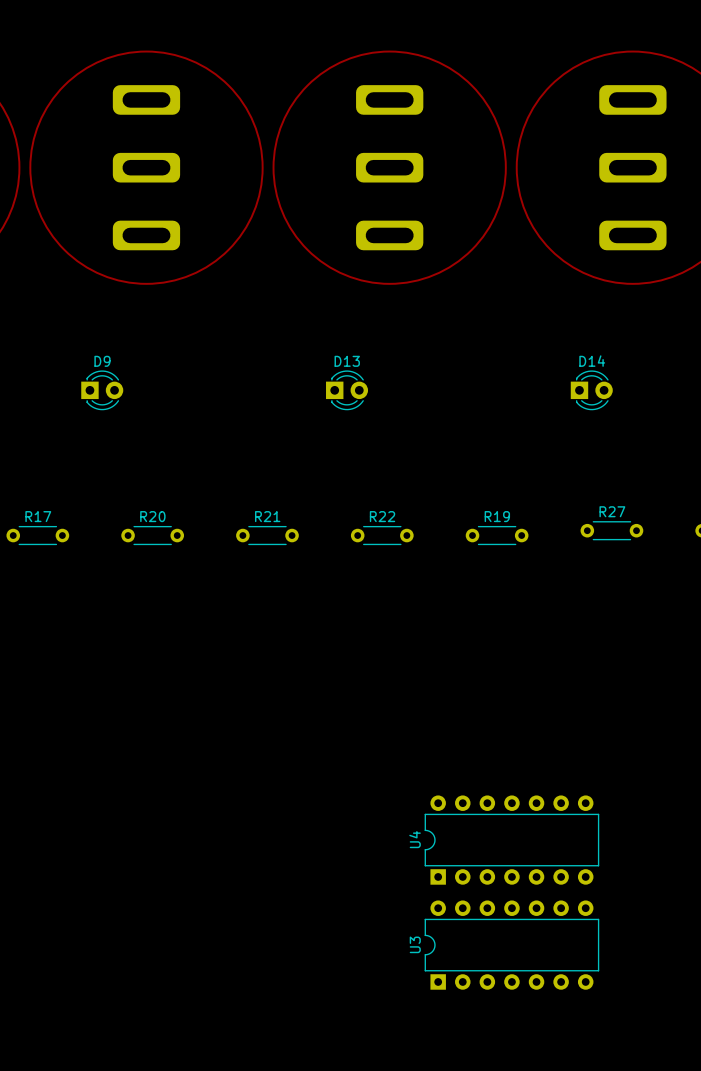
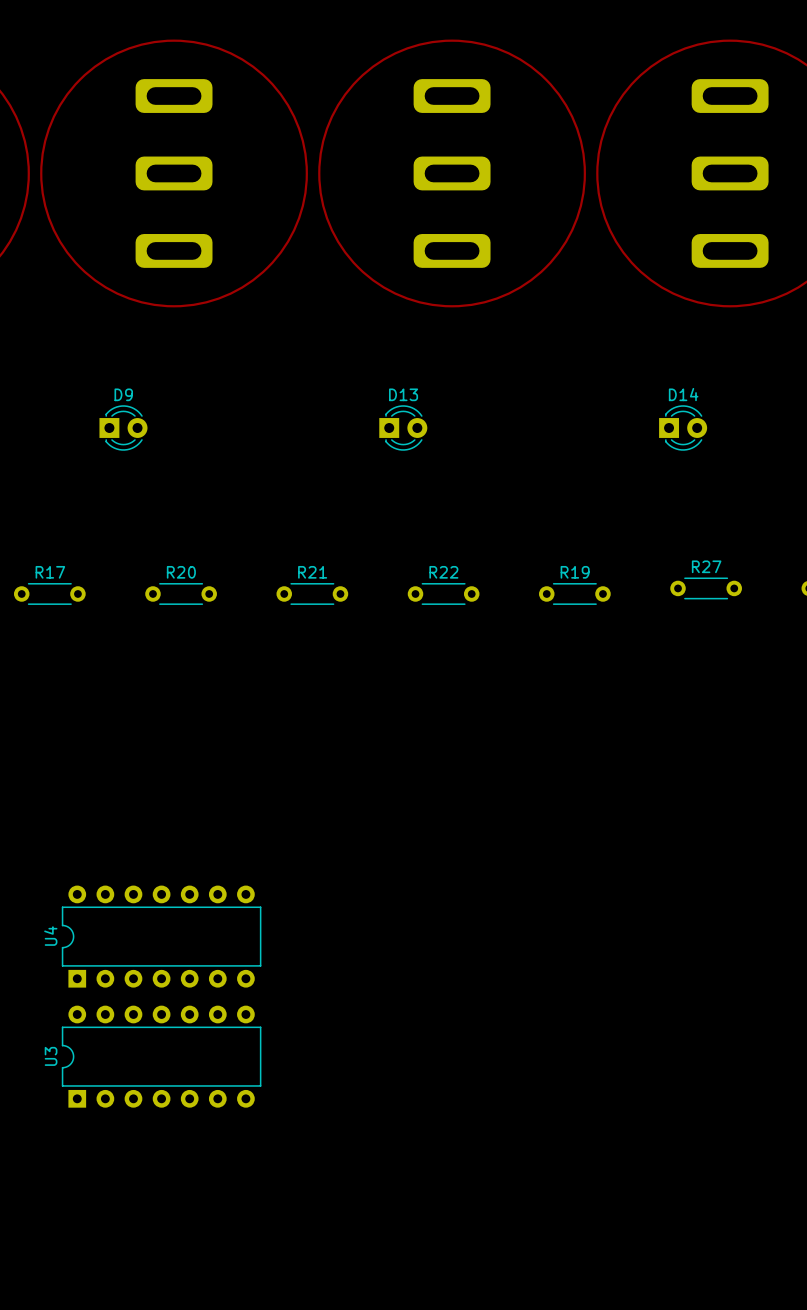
U4 position: (511, 840) -> (161, 936)
U3 position: (511, 945) -> (161, 1056)

